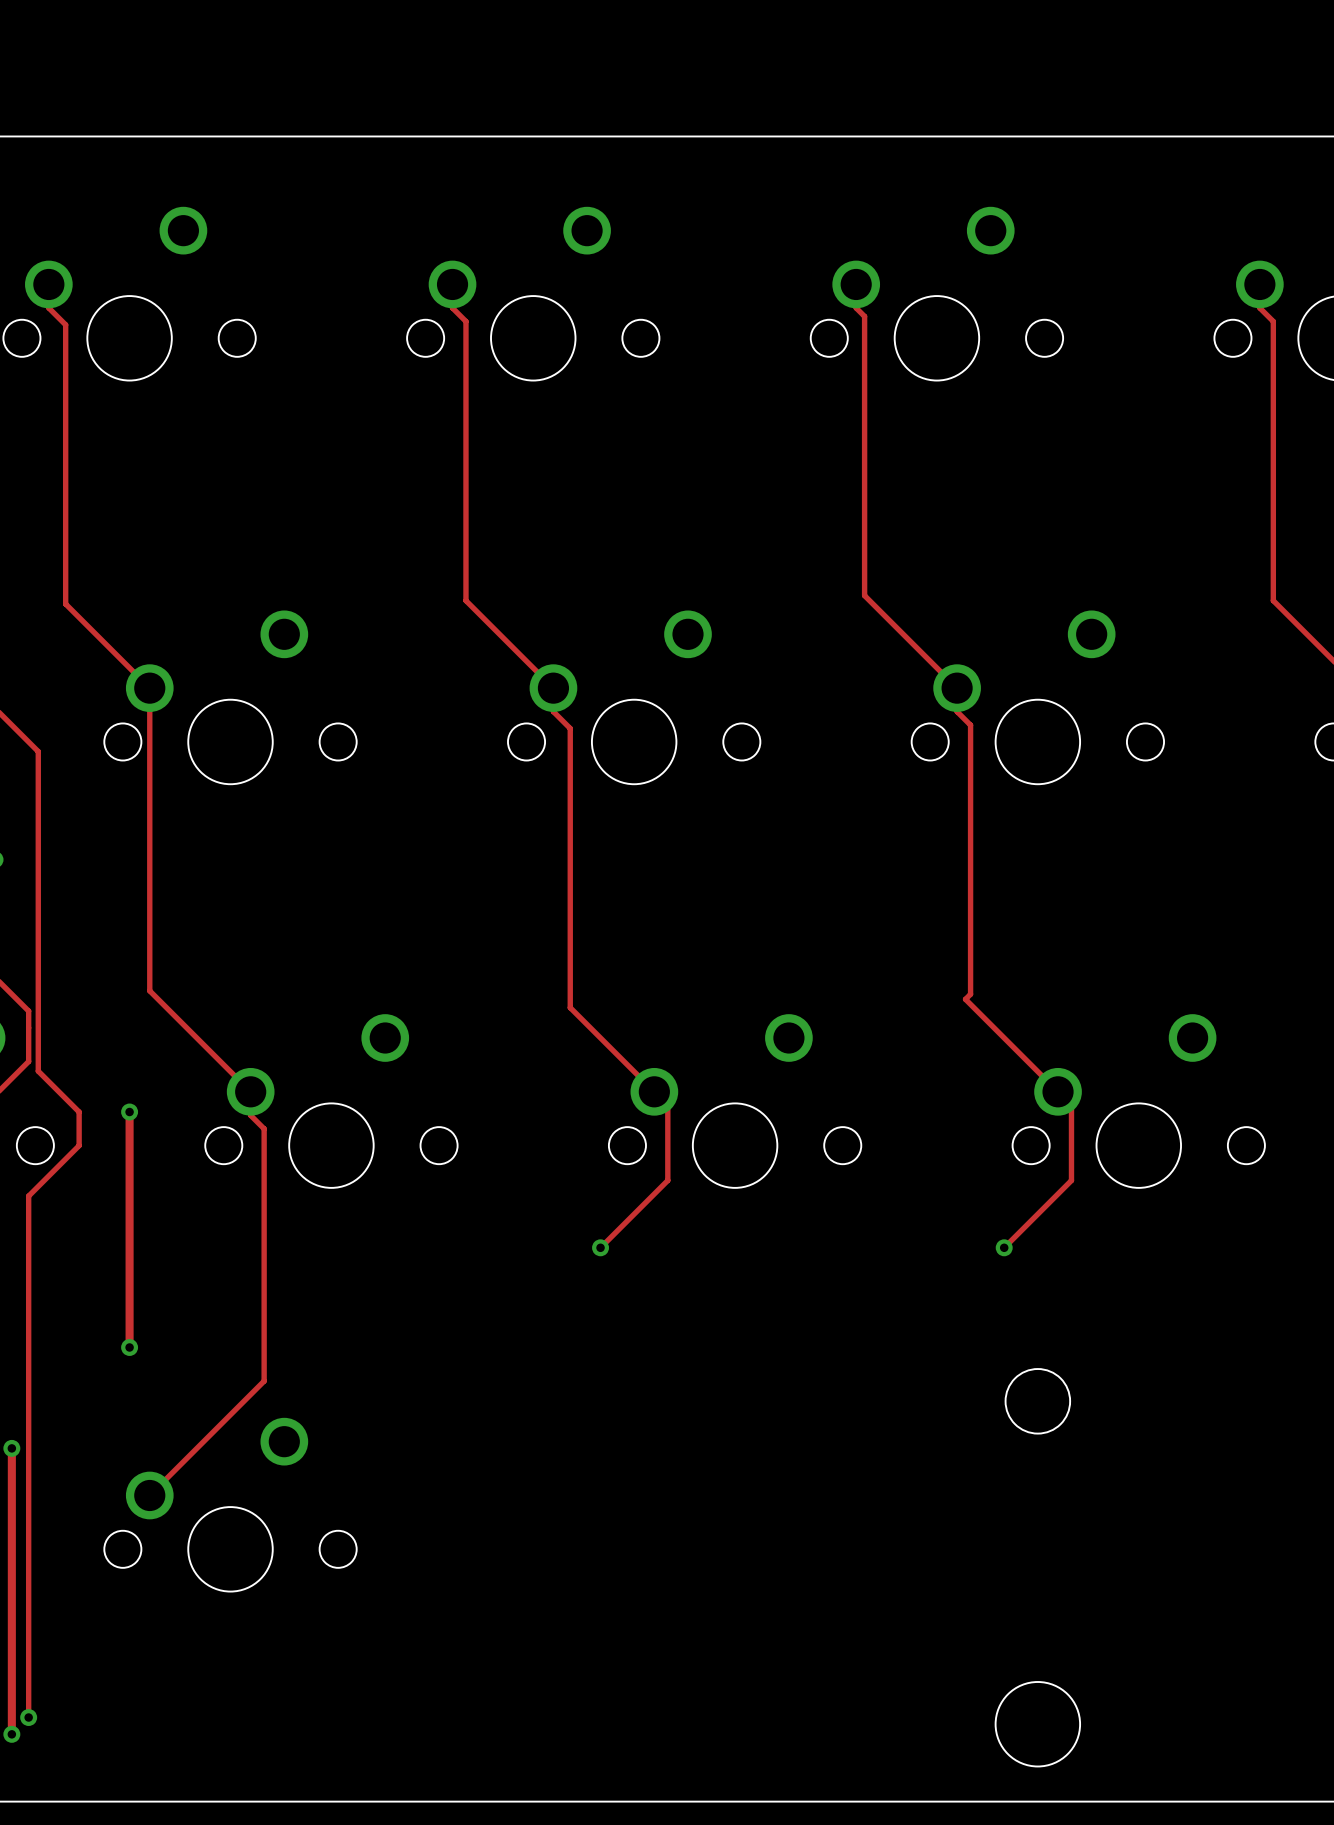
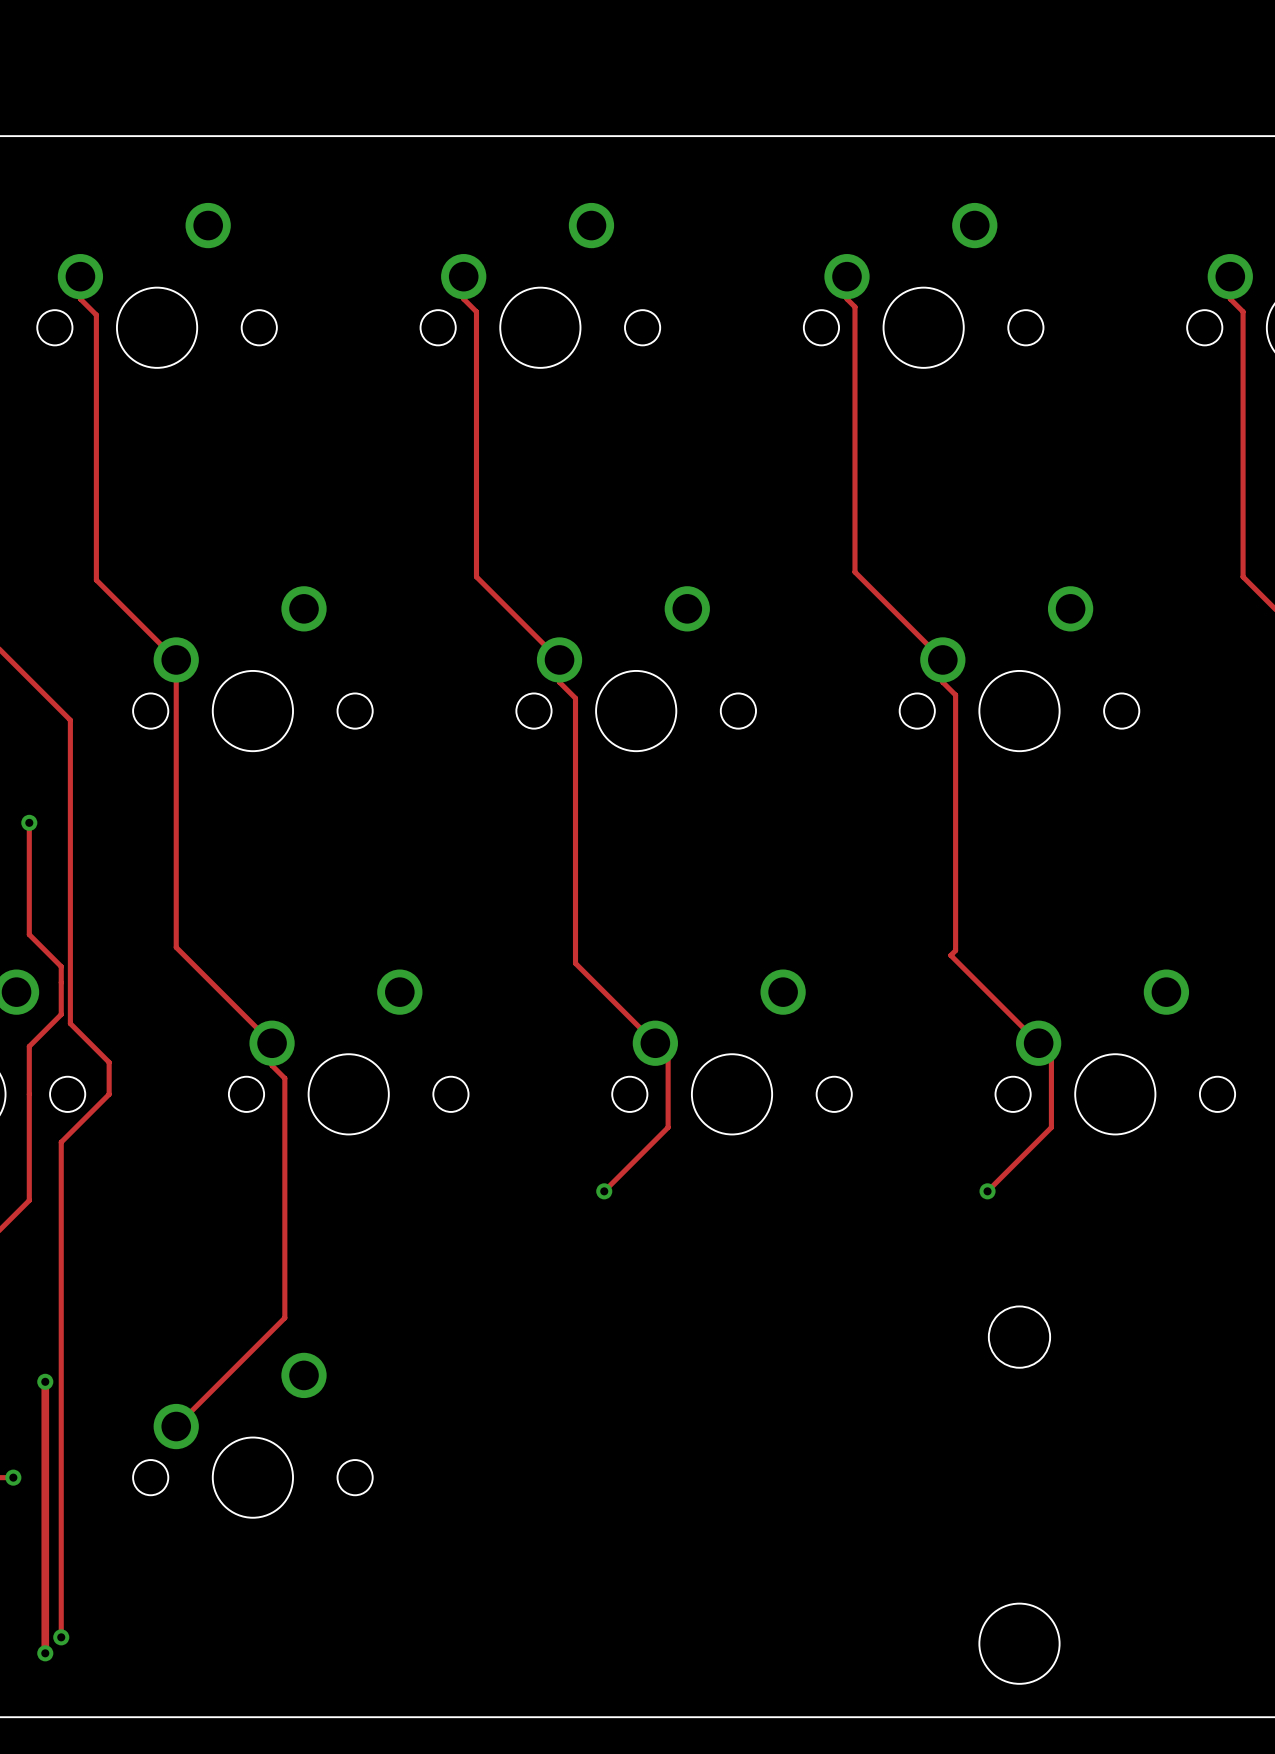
track: (129, 1112) (129, 1347) -> none
via: (129, 1112) -> none
via: (129, 1347) -> none

